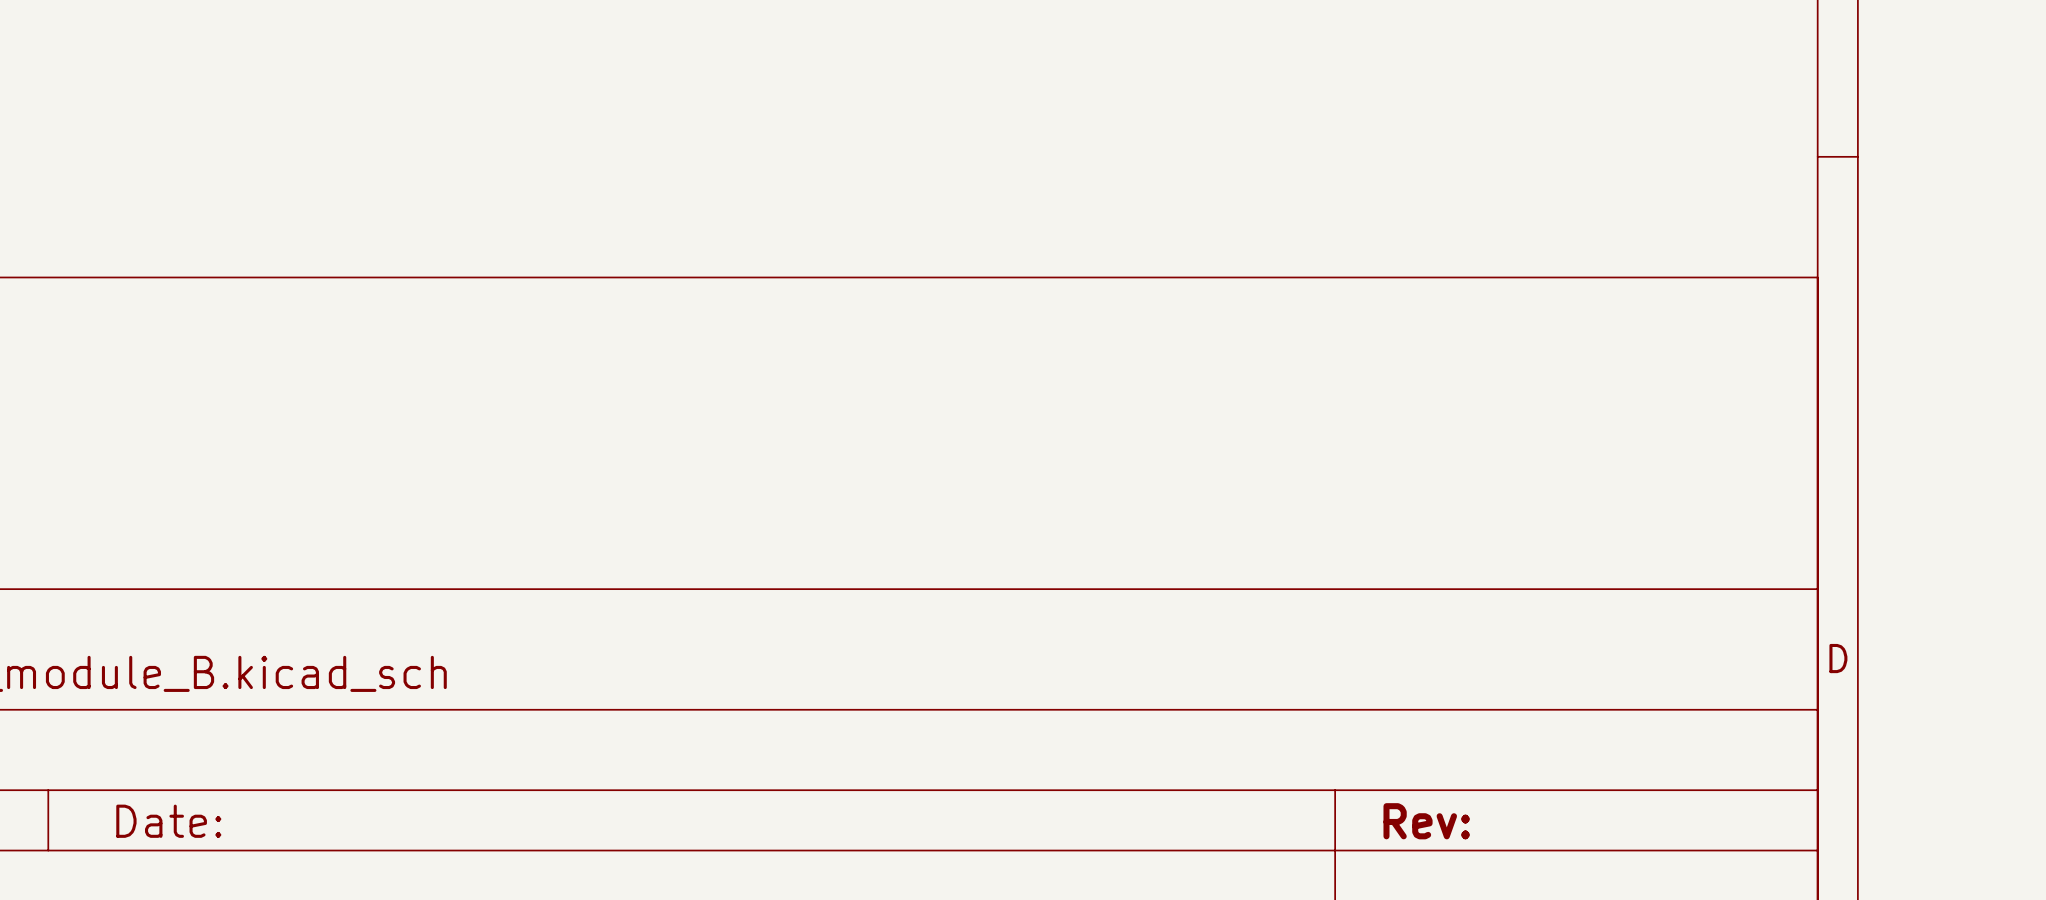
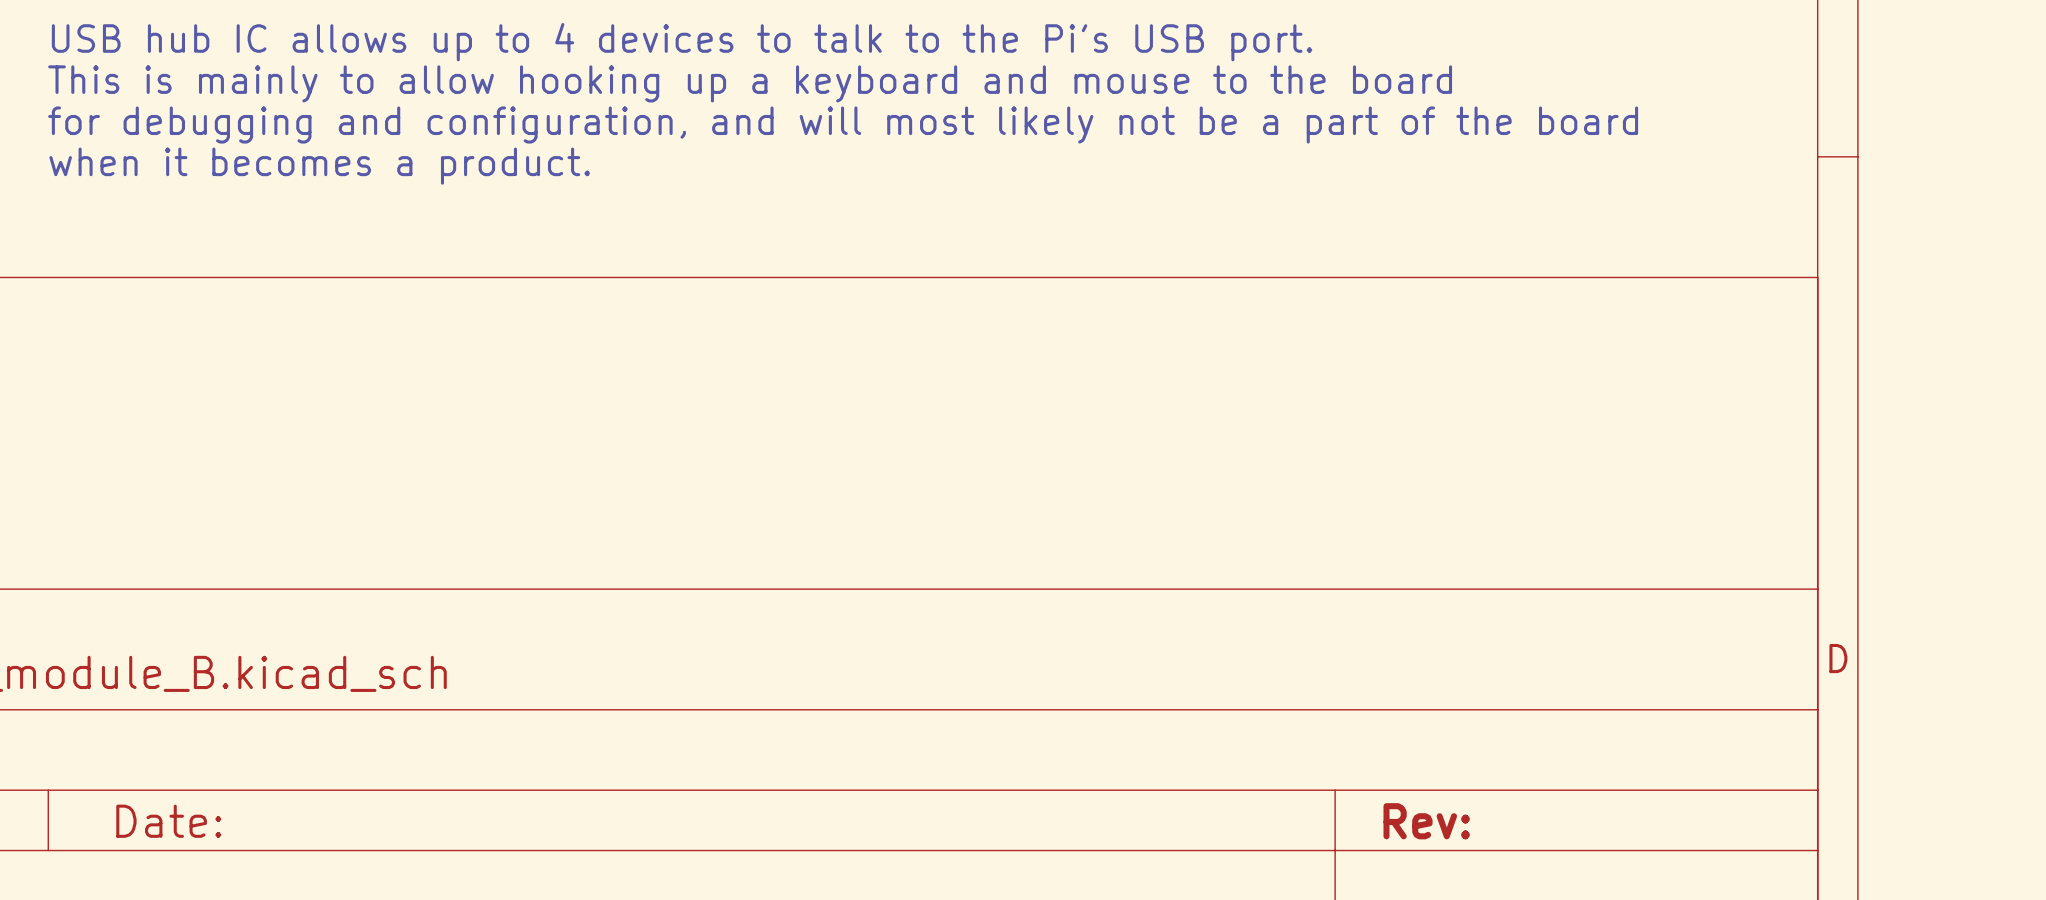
text: none -> USB hub IC allows up to 4 devices to talk to the Pi's USB port. (682, 42)
text: none -> This is mainly to allow hooking up a keyboard and mouse to the board (750, 83)
text: none -> for debugging and configuration, and will most likely not be a part of the board (843, 125)
text: none -> when it becomes a product. (319, 166)

